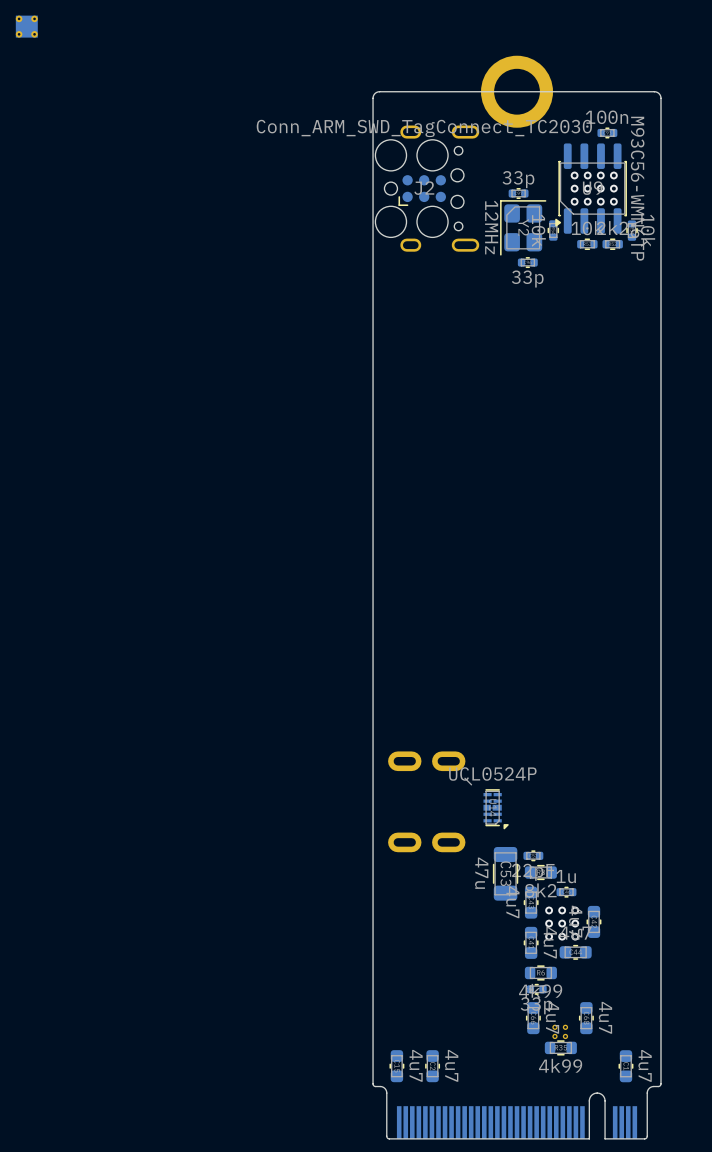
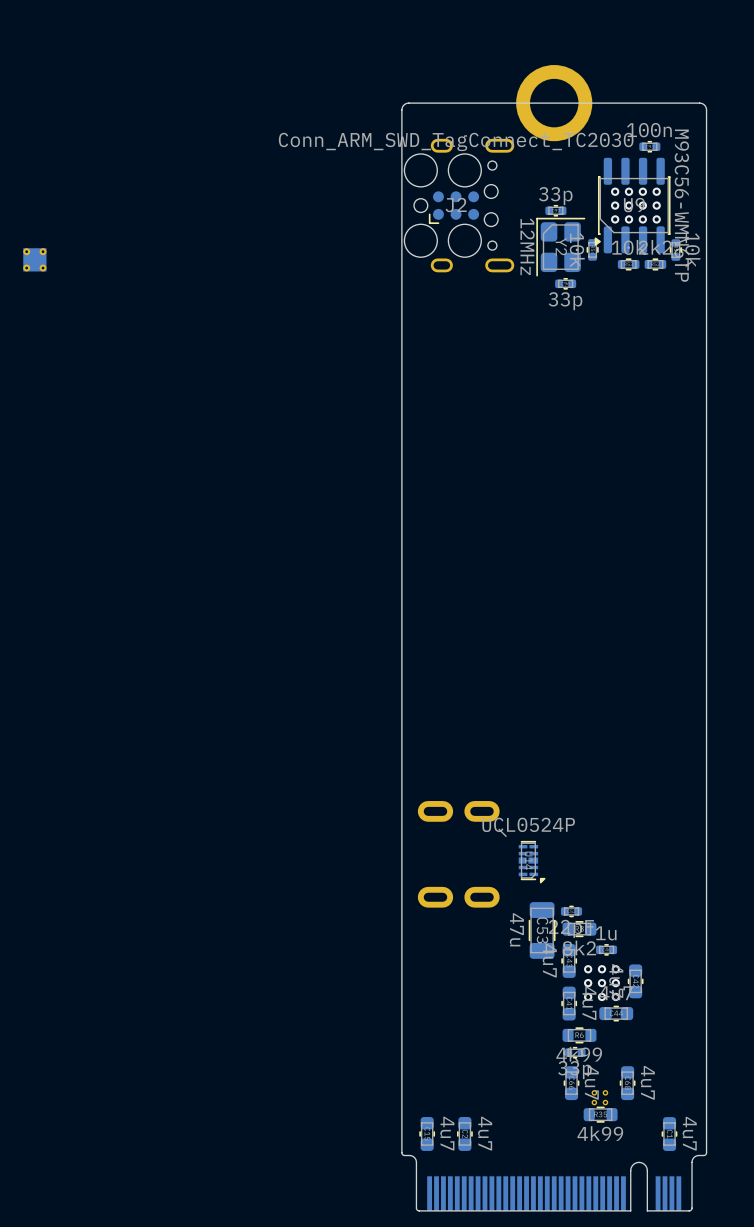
part position: (26, 26) -> (34, 259)

